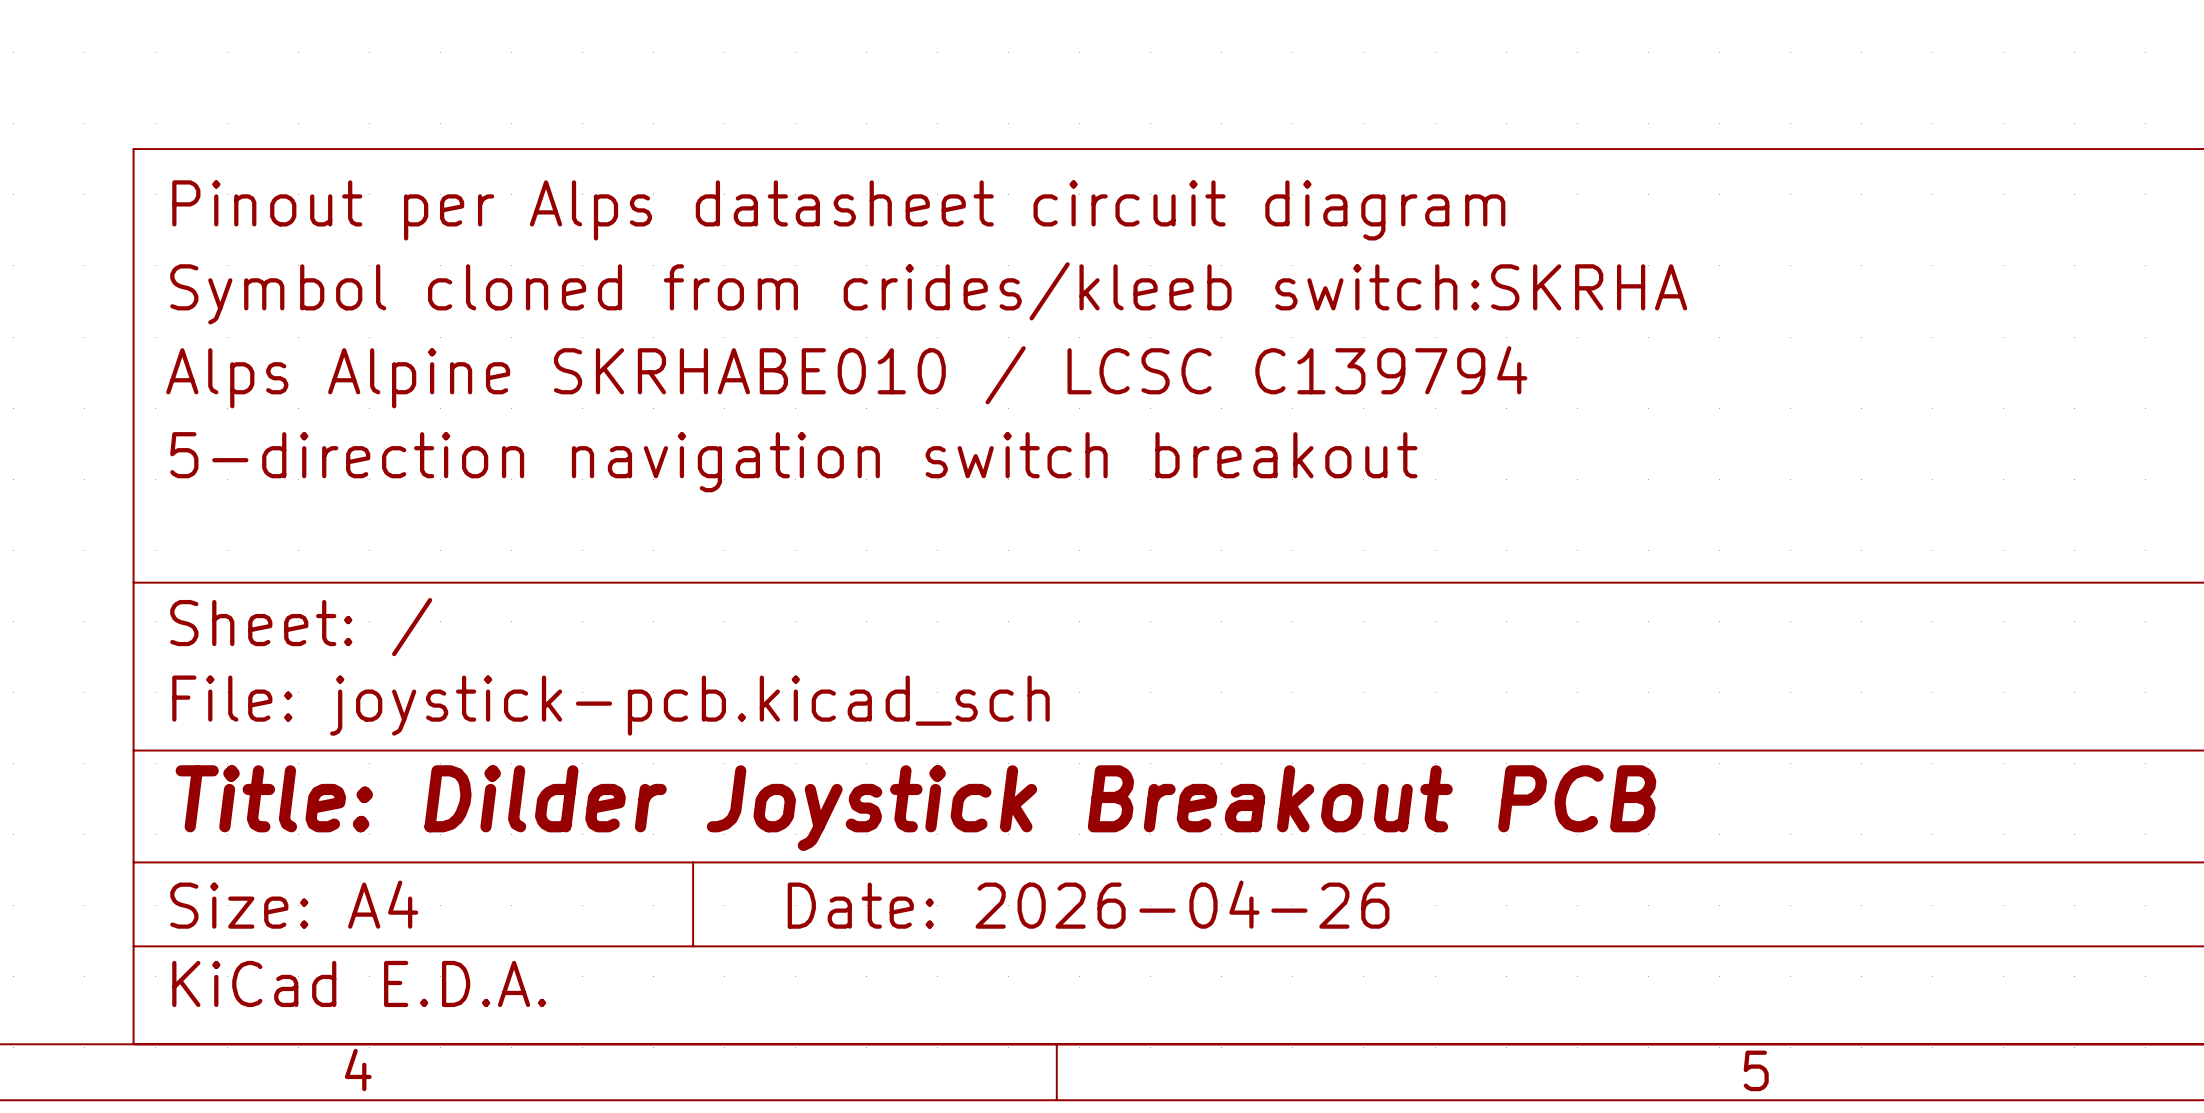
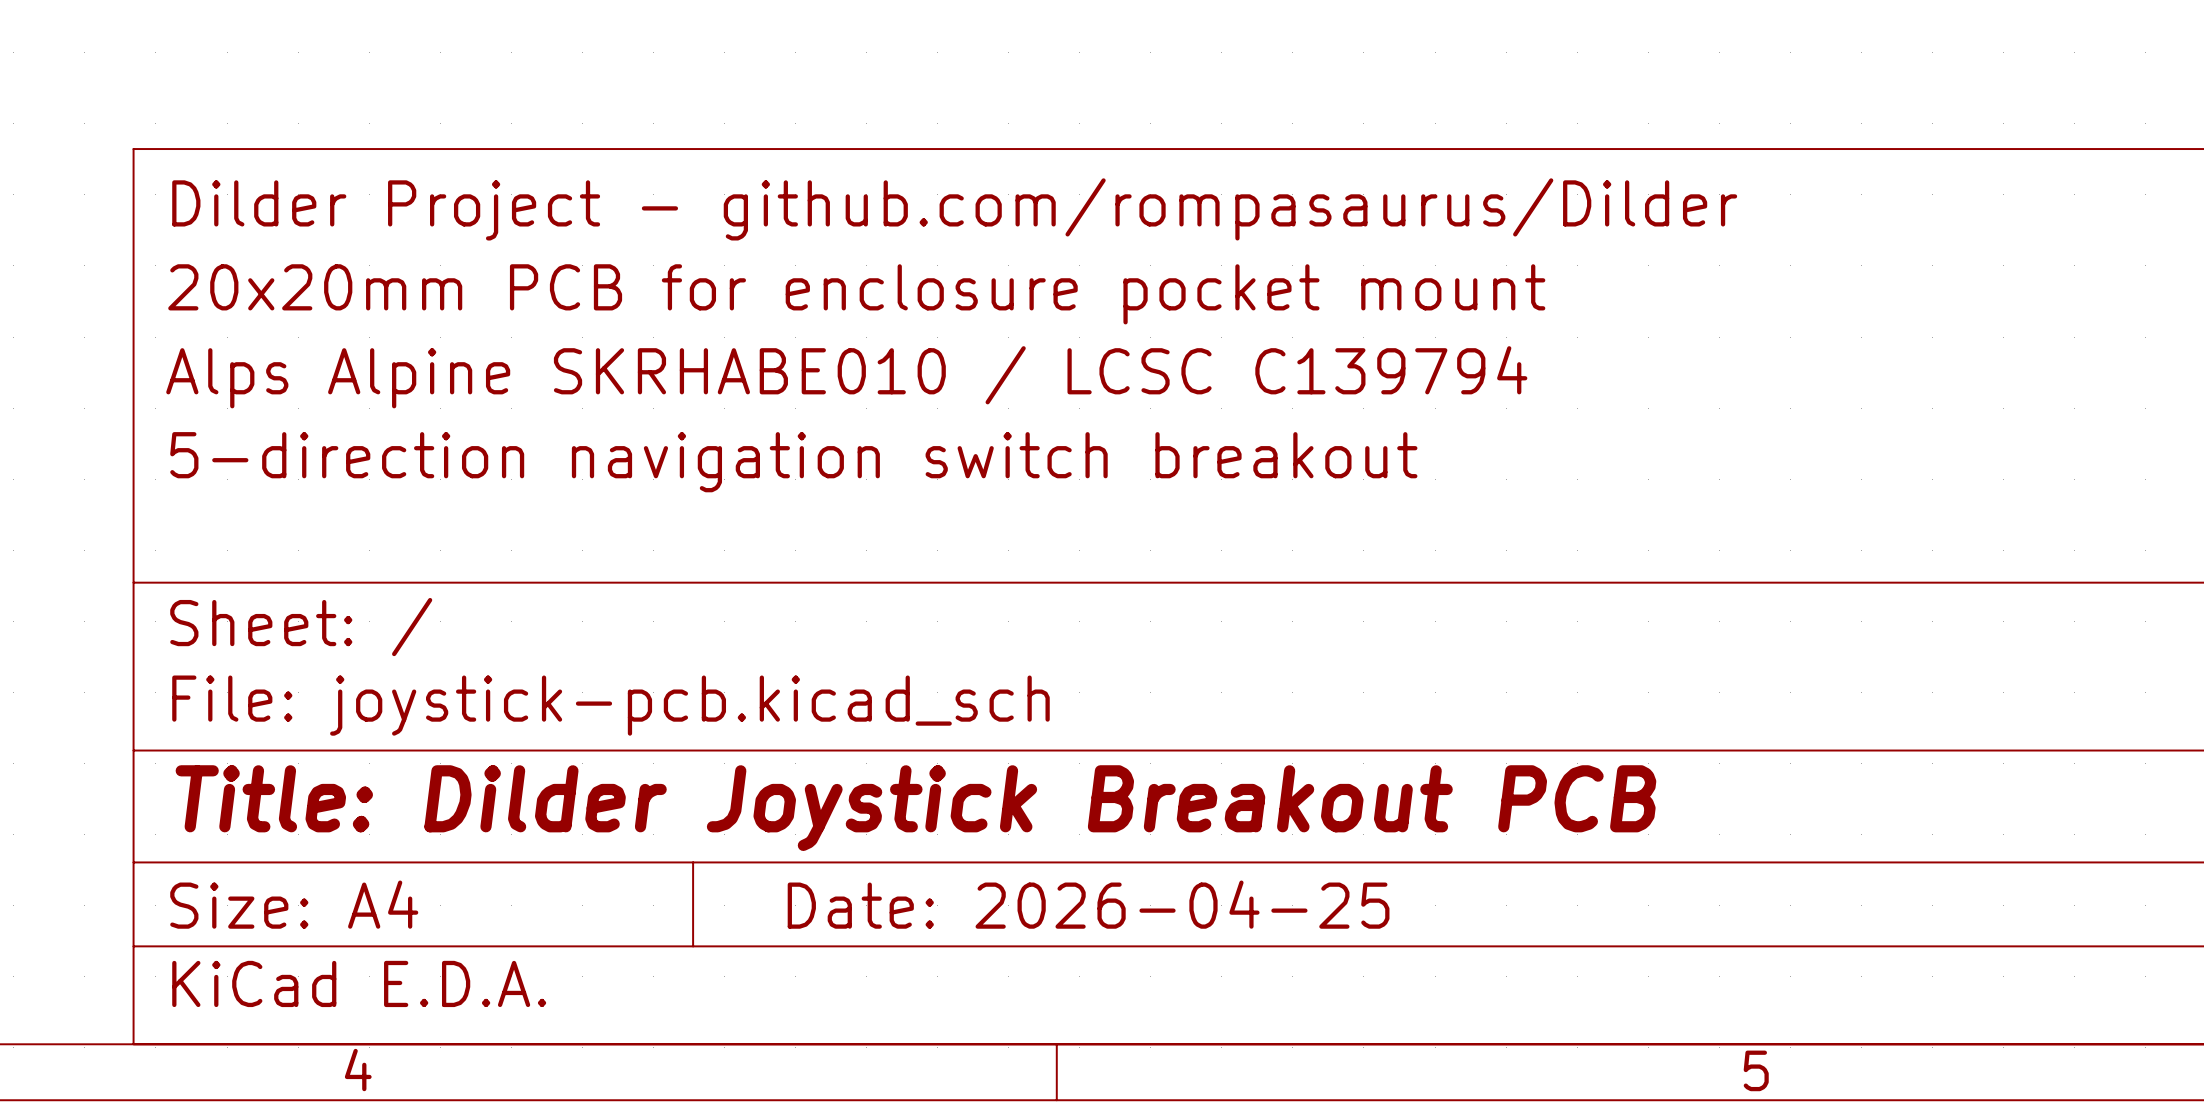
title block: Pinout per Alps datasheet circuit diagram (838, 210) -> Dilder Project - github.com/rompasaurus/Dilder (954, 209)
title block: Symbol cloned from crides/kleeb switch:SKRHA (928, 293) -> 20x20mm PCB for enclosure pocket mount (856, 294)
title block: Date: 2026-04-26 (1088, 904) -> Date: 2026-04-25 (1088, 904)

